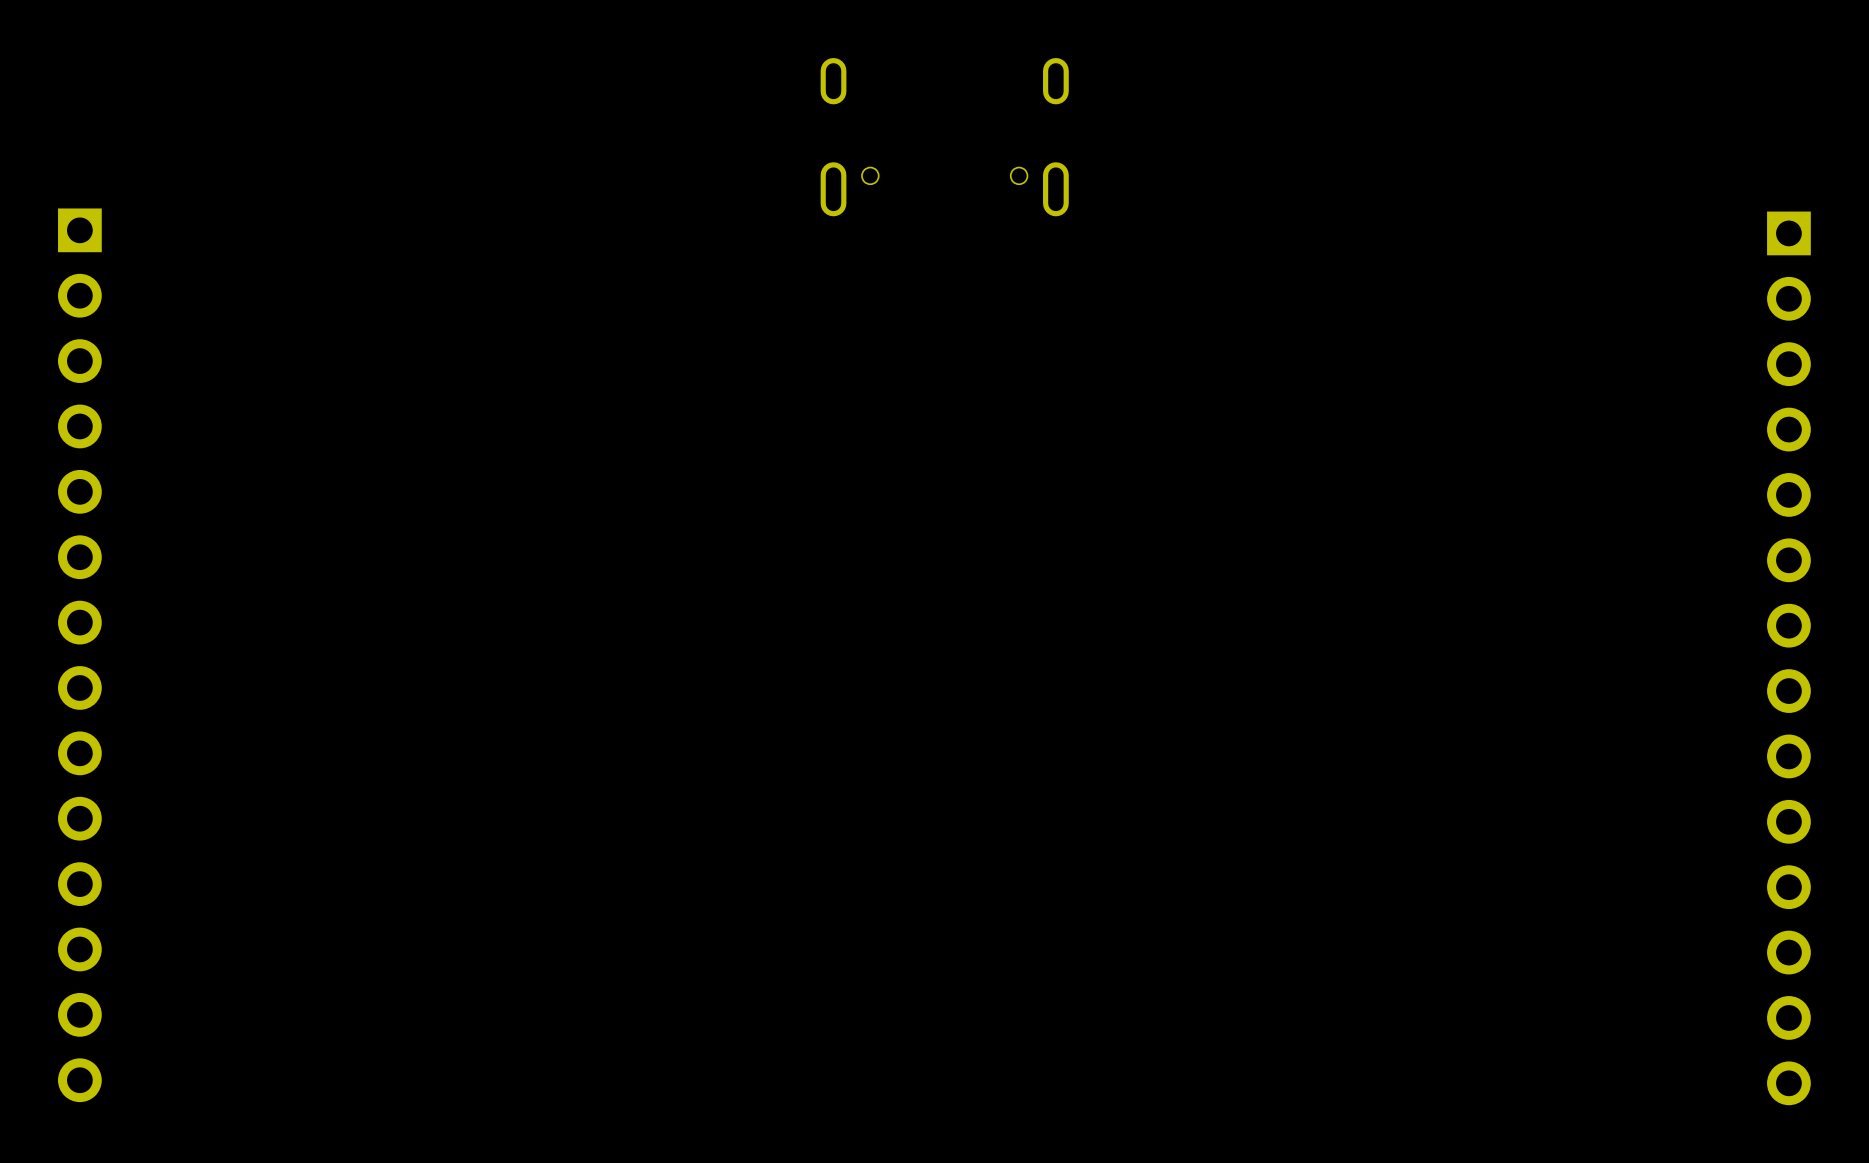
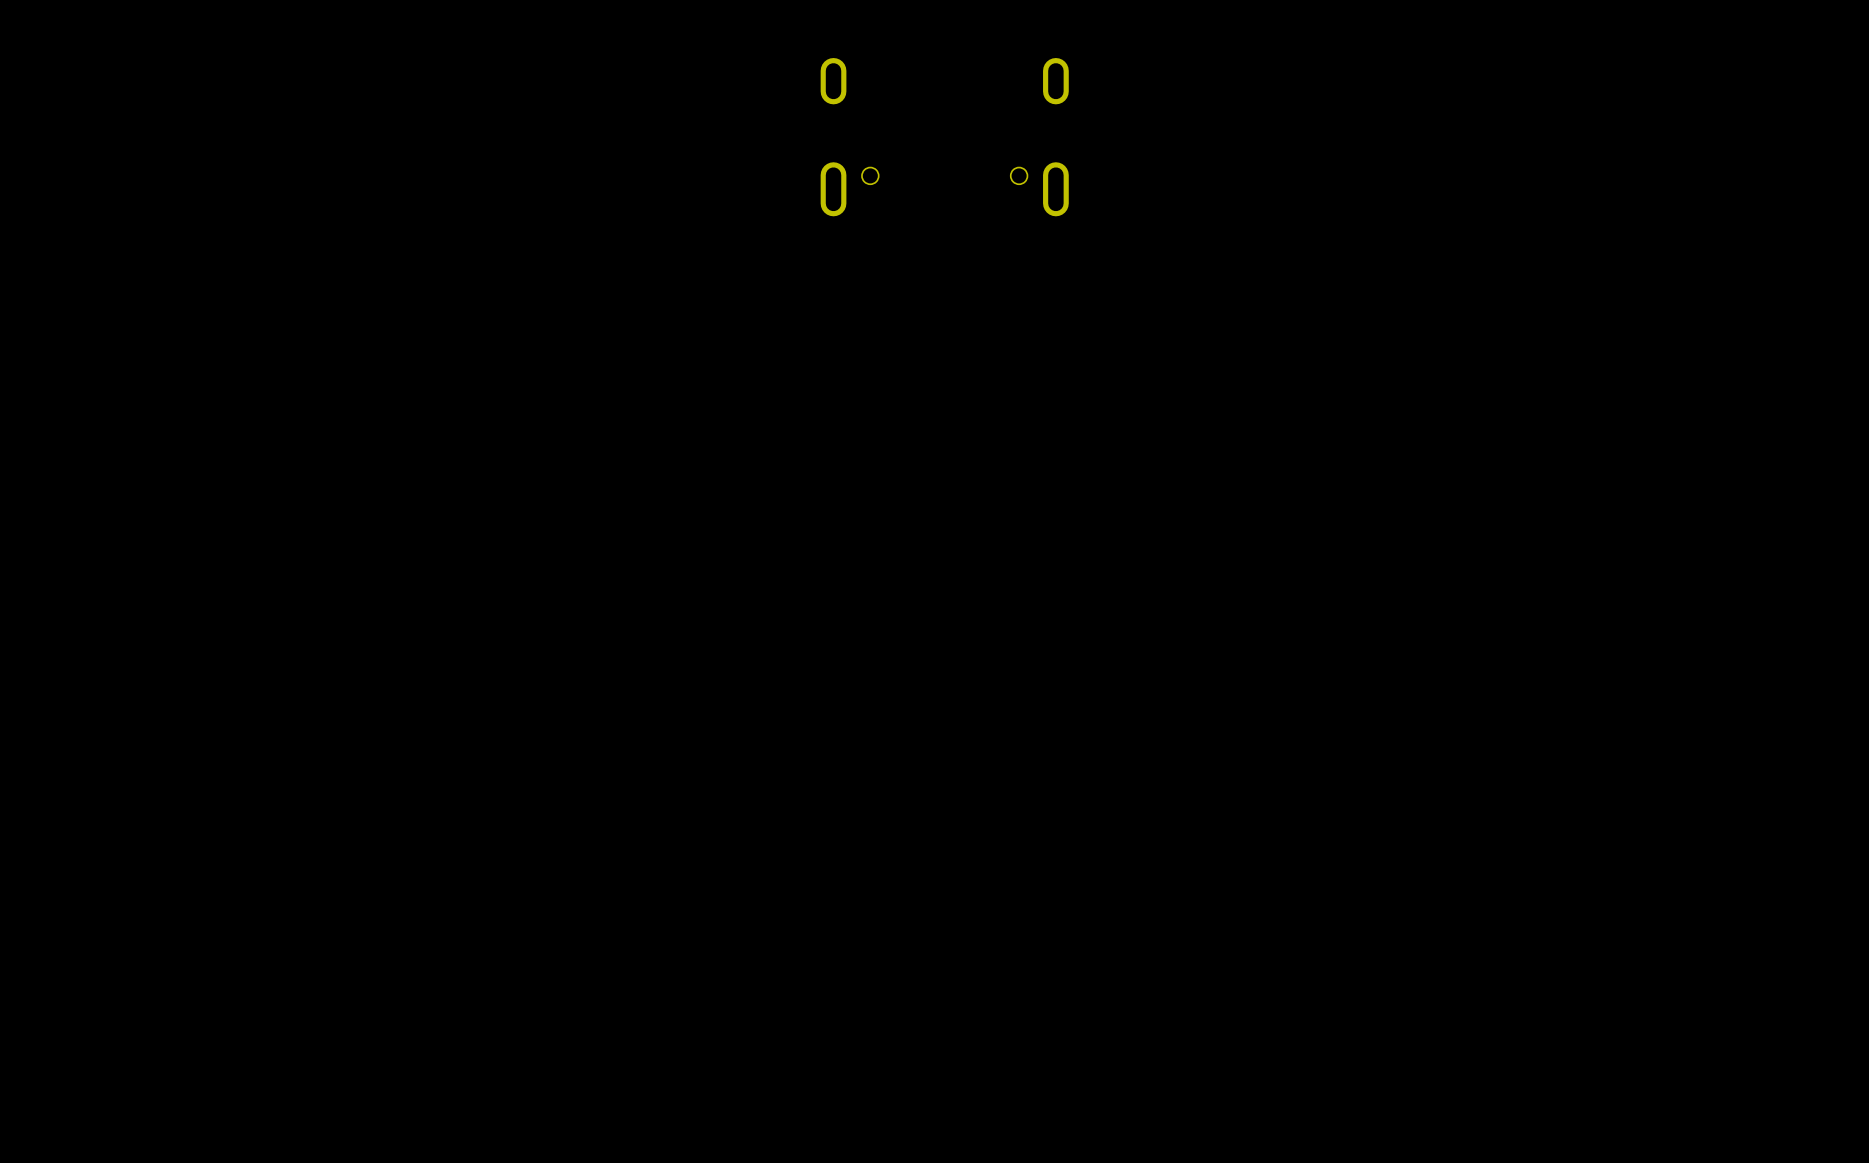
part: (79, 655) -> none
part: (1788, 658) -> none

